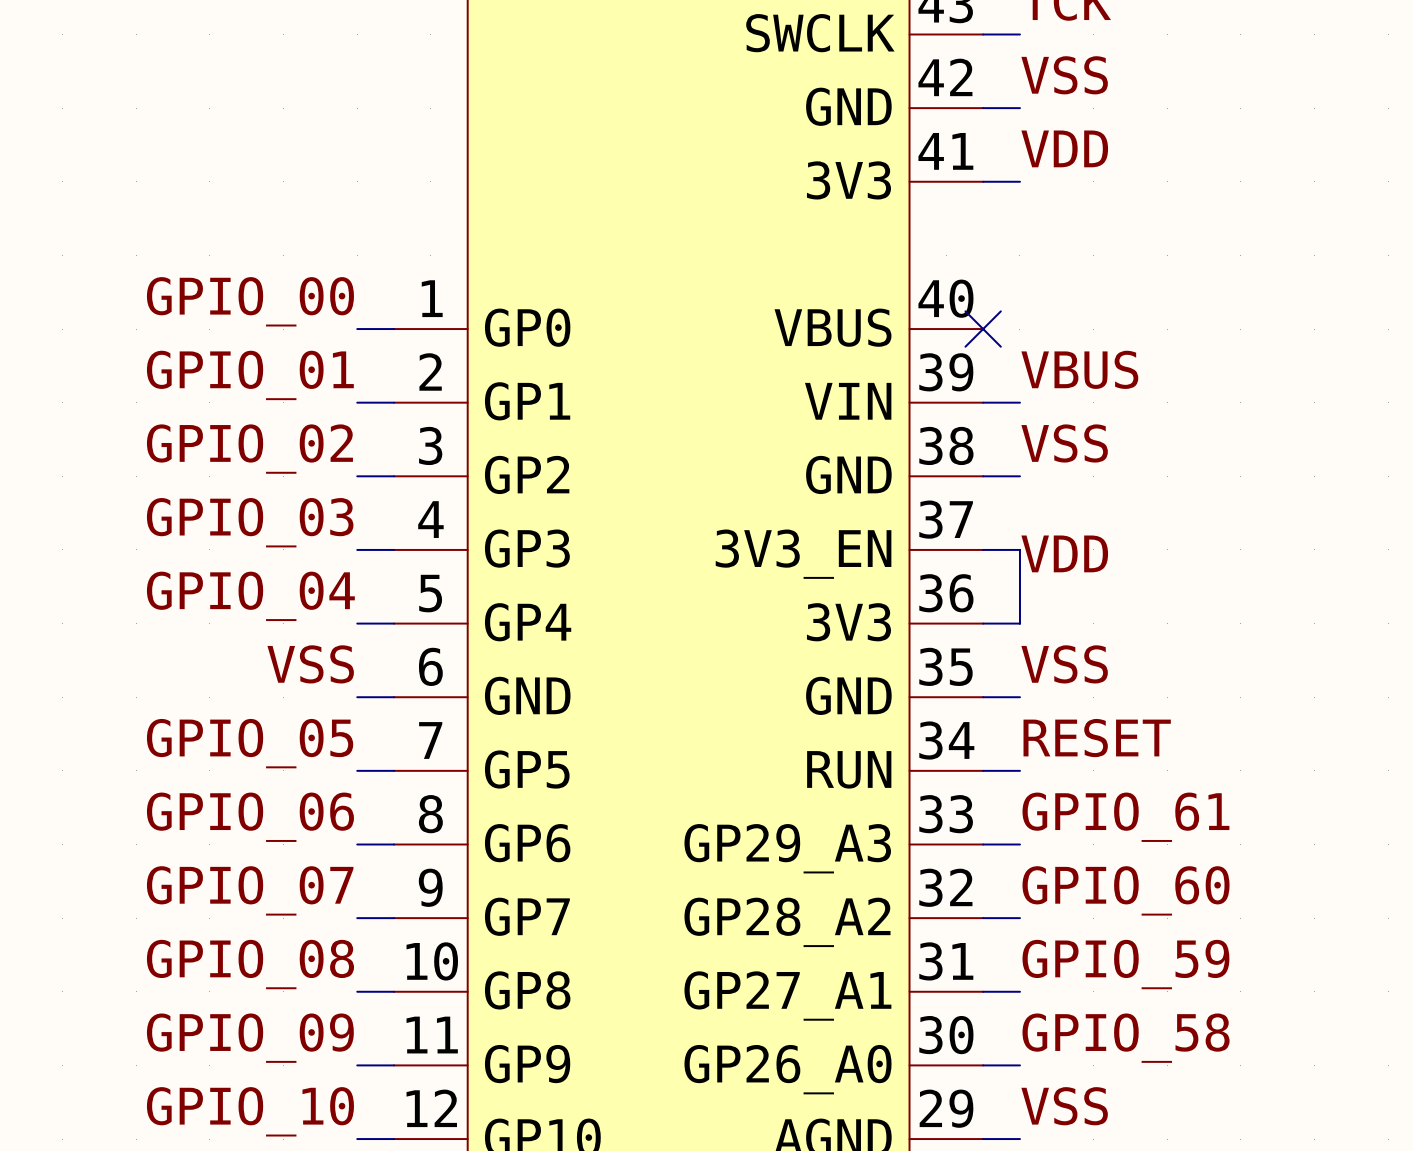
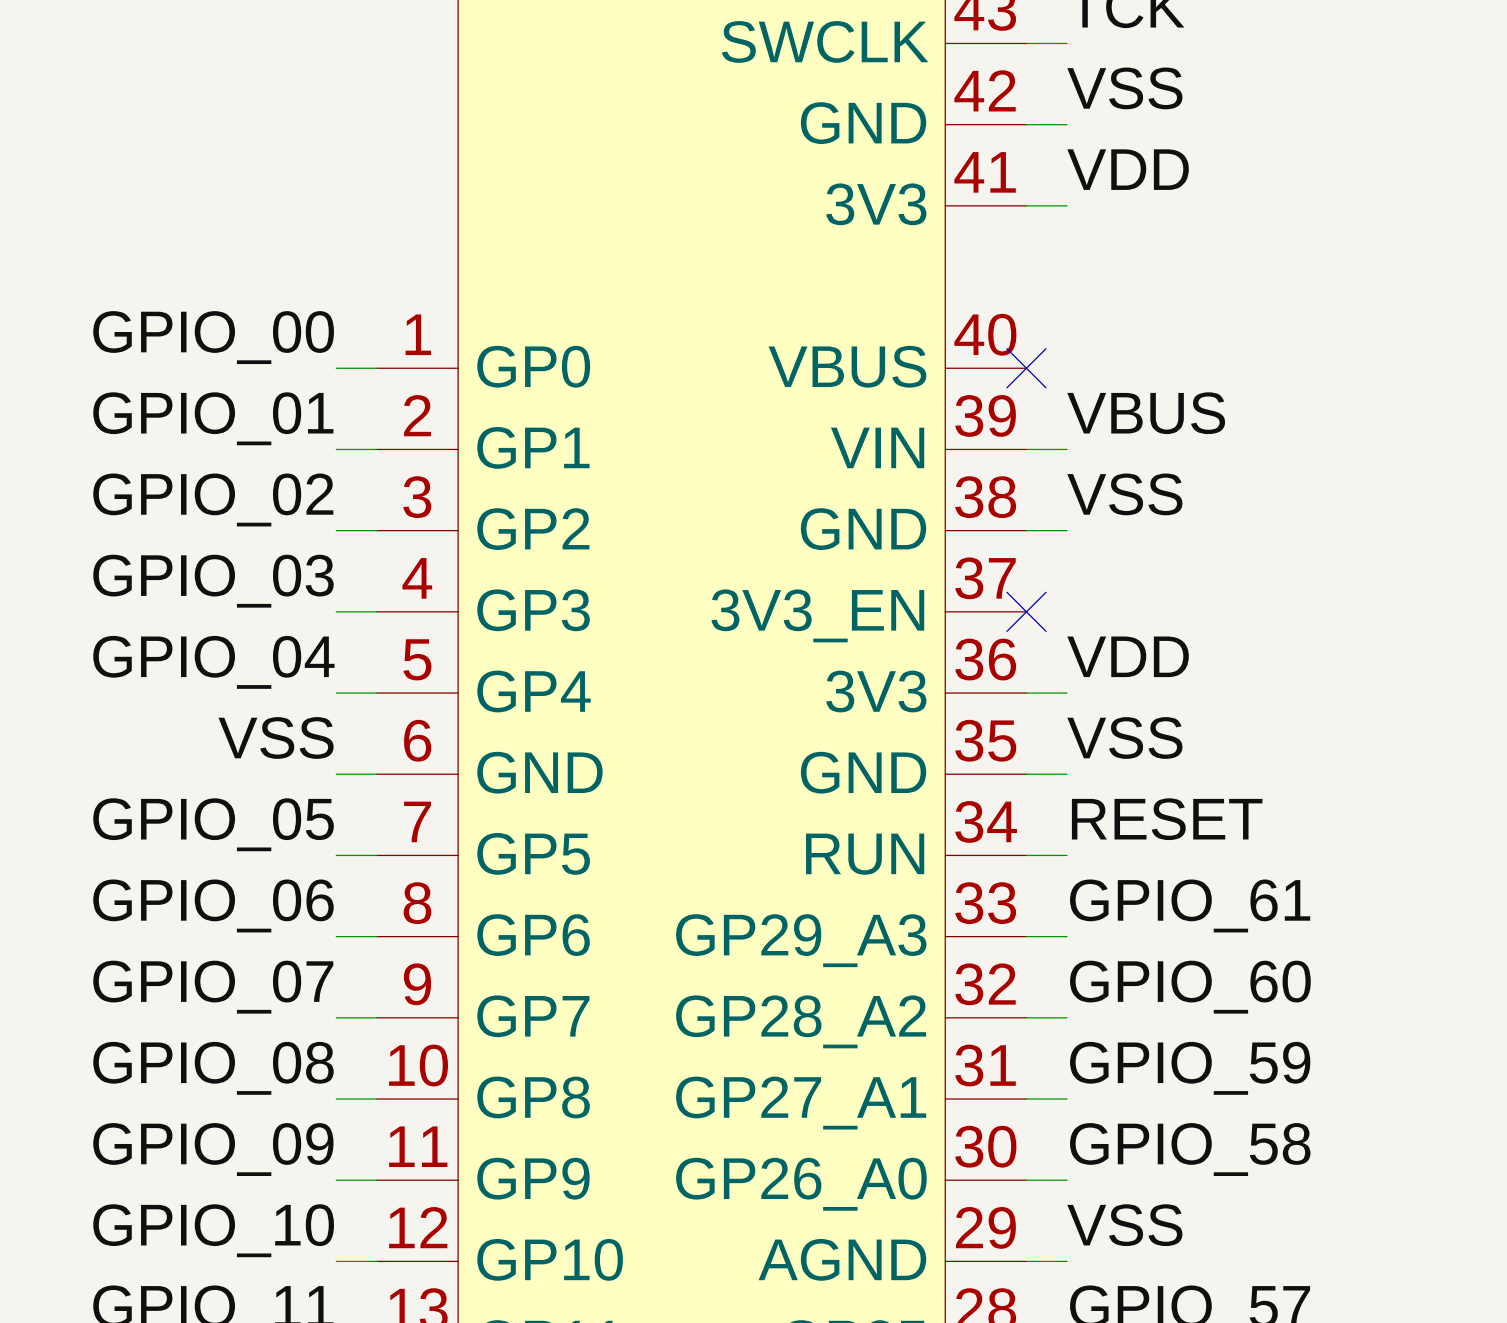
wire: (983, 549) (1019, 549) (1019, 623) -> none
no-connect mark: none -> (1026, 611)
label position: VDD (1064, 553) -> VDD (1128, 656)

